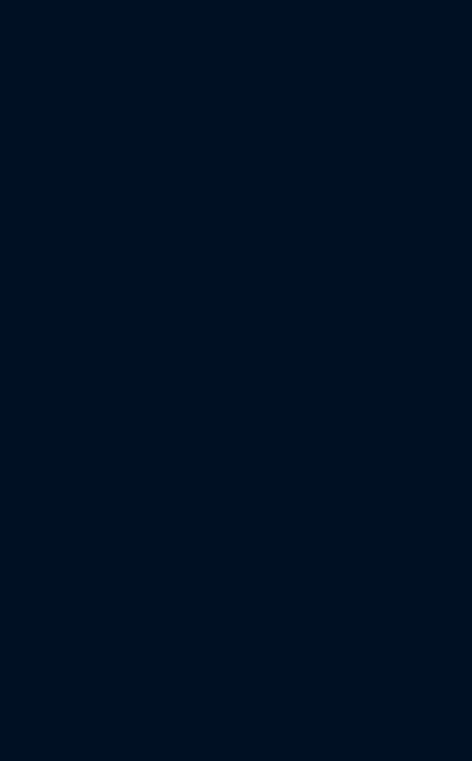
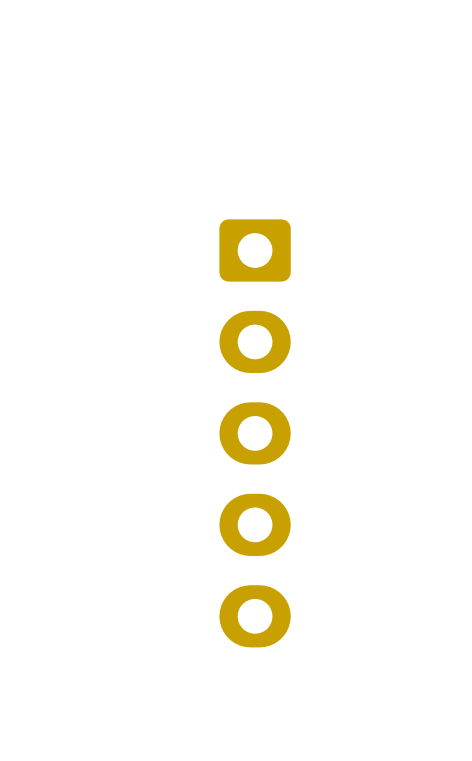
part: none -> (255, 433)

